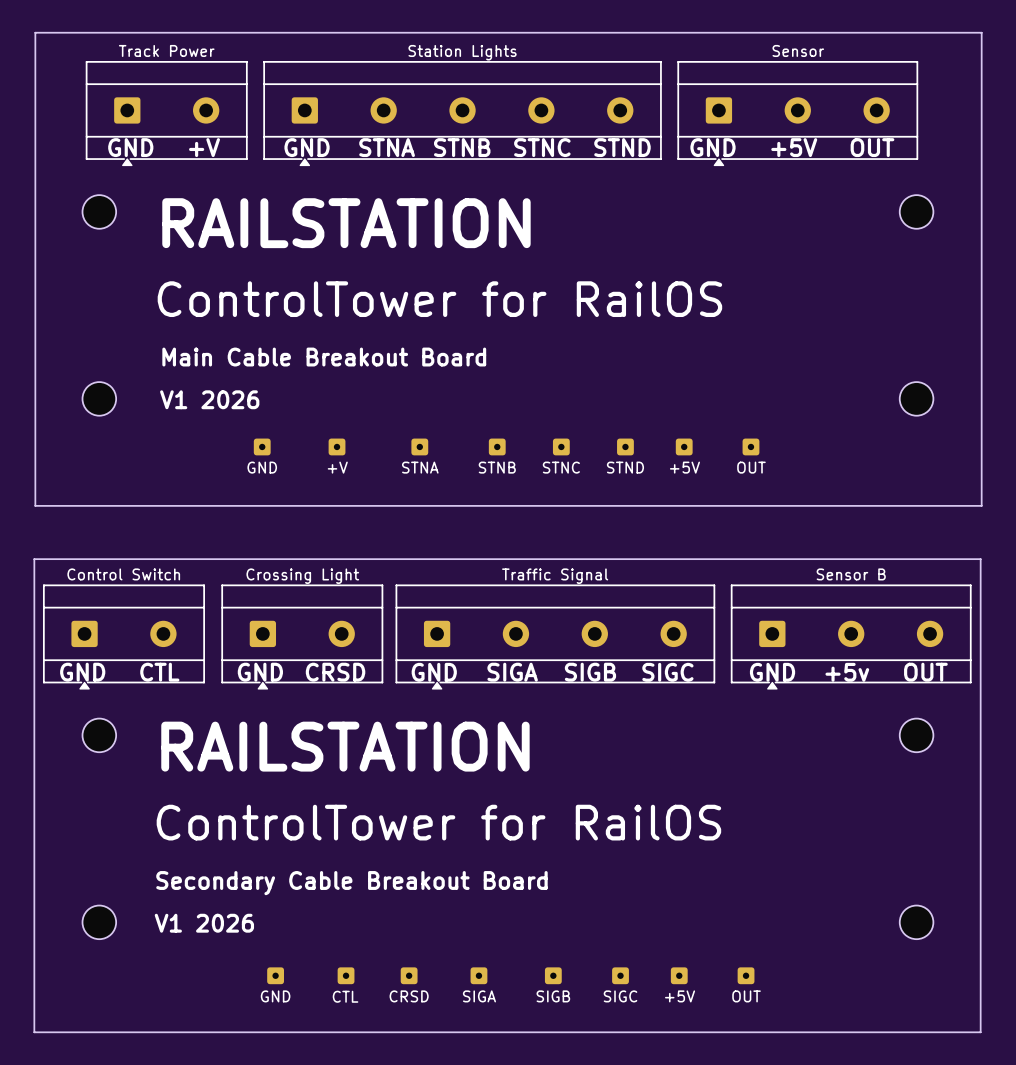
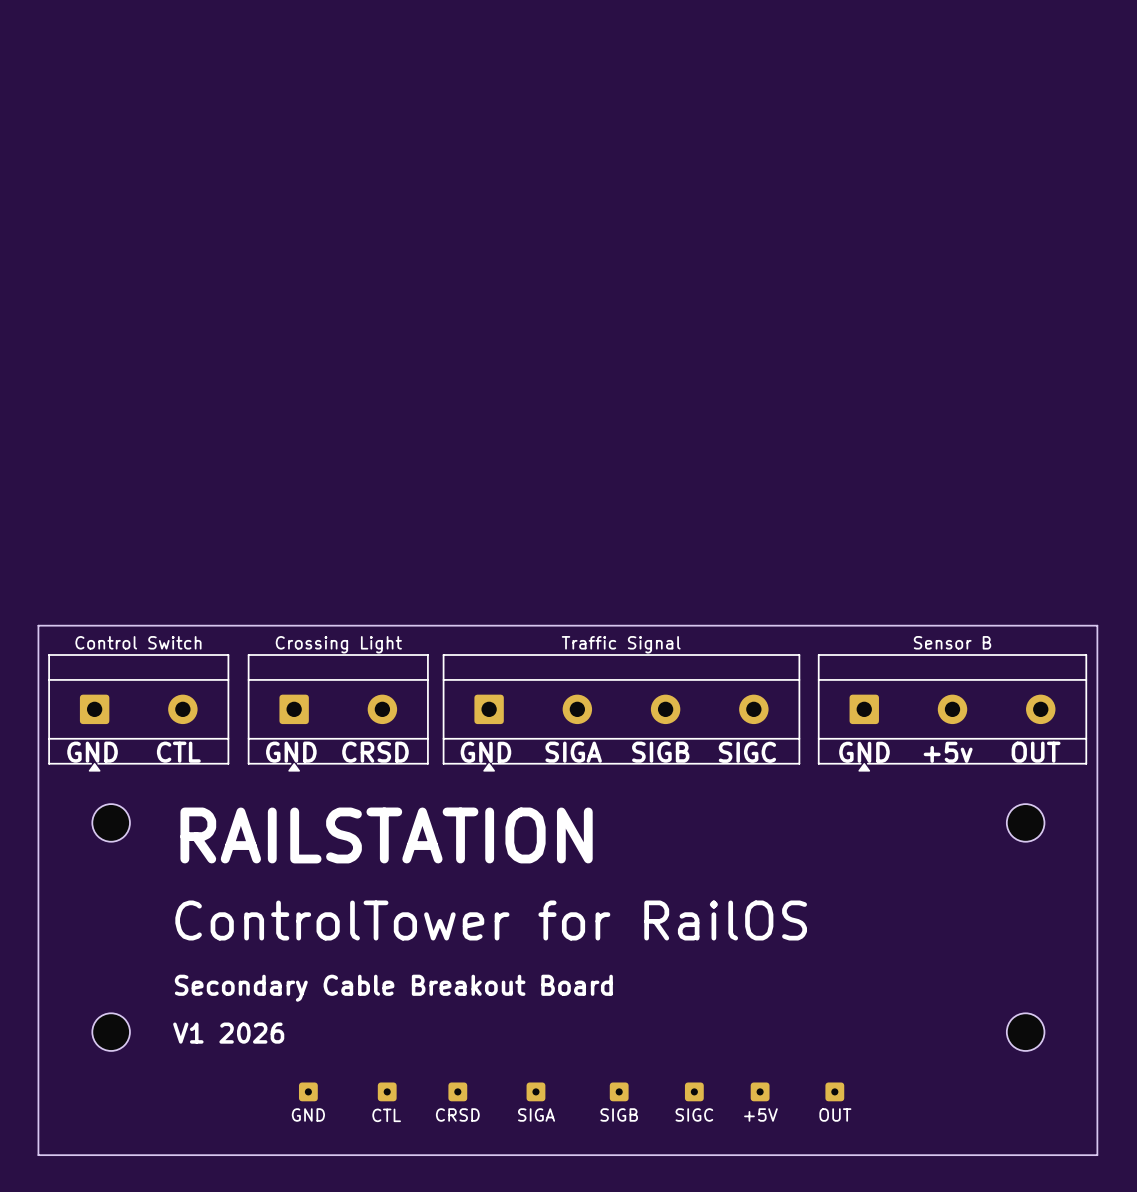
board edge: (35, 32) (981, 32) (981, 505) (35, 505) (35, 32) -> none
Track Power: (166, 113) -> none
Station Lights: (462, 113) -> none
Sensor: (797, 113) -> none
text: GND (130, 147) -> none
text: +V (204, 147) -> none
text: GND (307, 147) -> none
text: STNA (387, 147) -> none
text: STNB (462, 147) -> none
text: STNC (542, 147) -> none
text: STND (622, 147) -> none
text: GND (712, 147) -> none
text: +5V (794, 147) -> none
text: OUT (872, 147) -> none
part: (99, 211) -> none
part: (916, 211) -> none
text: RAILSTATION (346, 223) -> none
text: ControlTower for RailOS (439, 299) -> none
text: Main Cable Breakout Board (324, 357) -> none
part: (99, 398) -> none
part: (916, 398) -> none
text: V1 2026 (209, 399) -> none
GND: (262, 446) -> none
+V: (337, 446) -> none
STNA: (419, 446) -> none
STNB: (497, 446) -> none
STNC: (561, 446) -> none
STND: (625, 446) -> none
+5V: (684, 446) -> none
OUT: (750, 446) -> none

